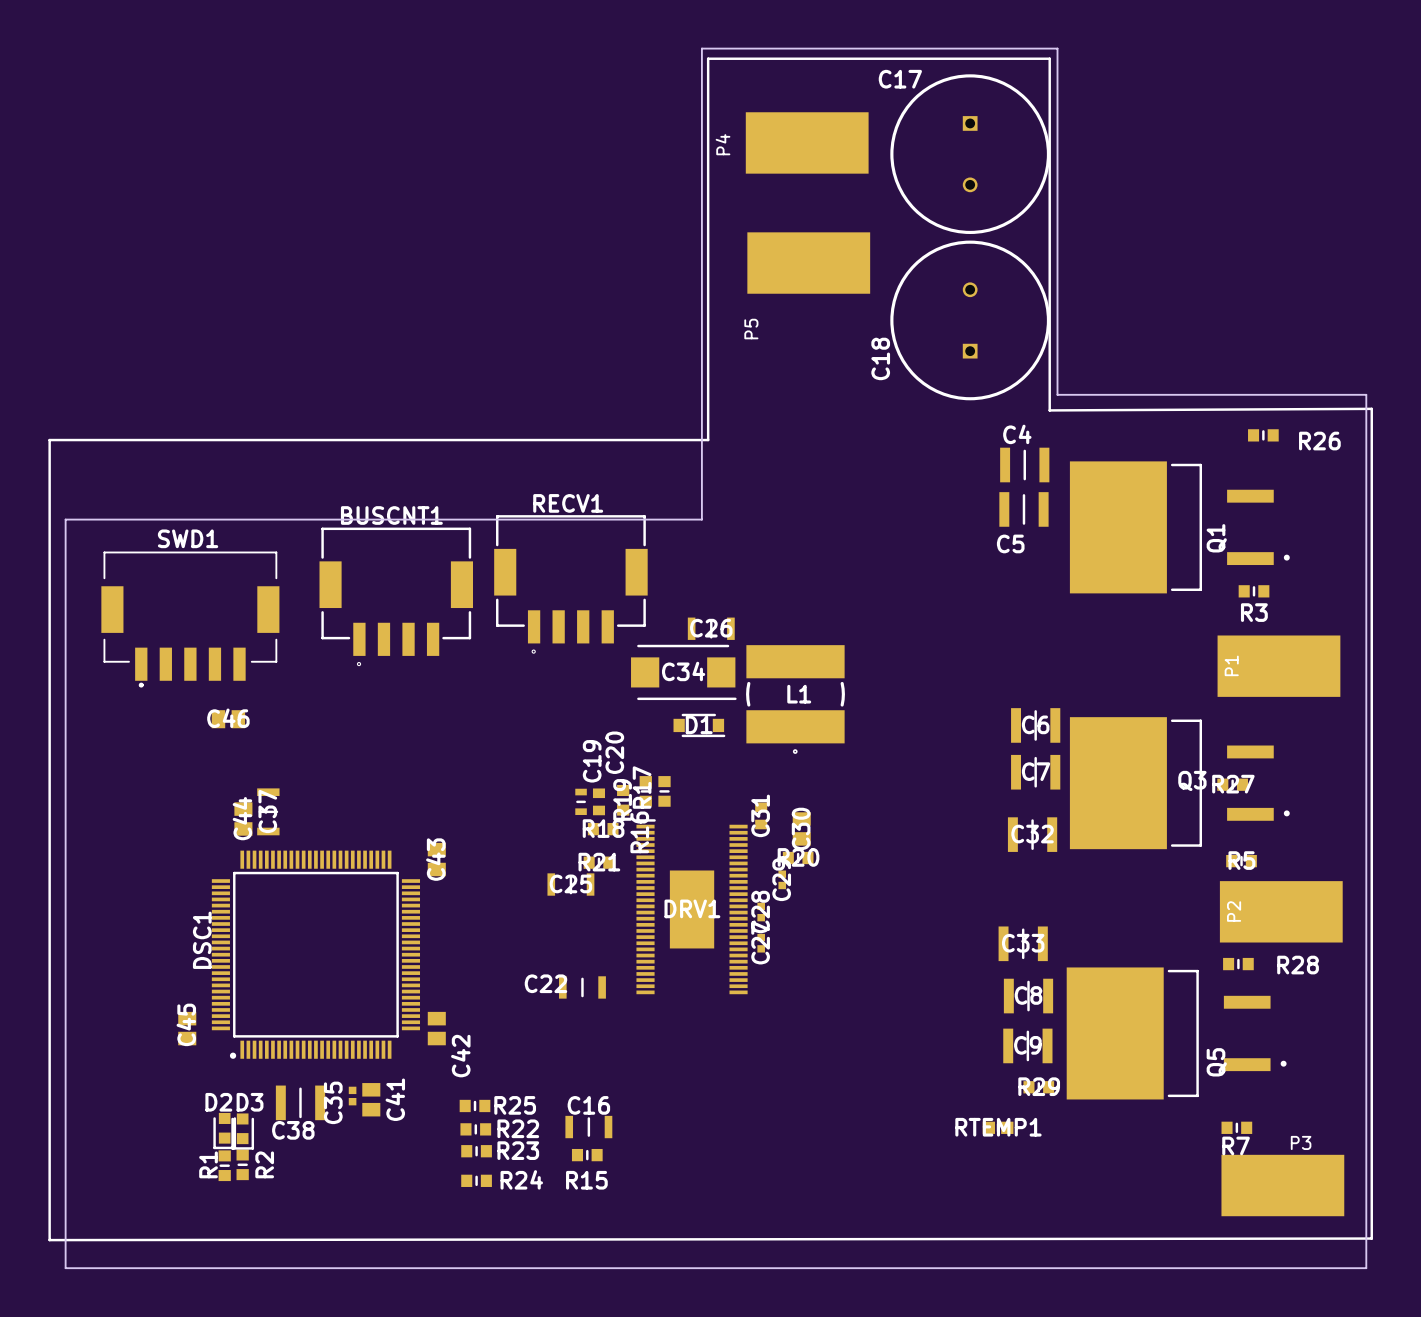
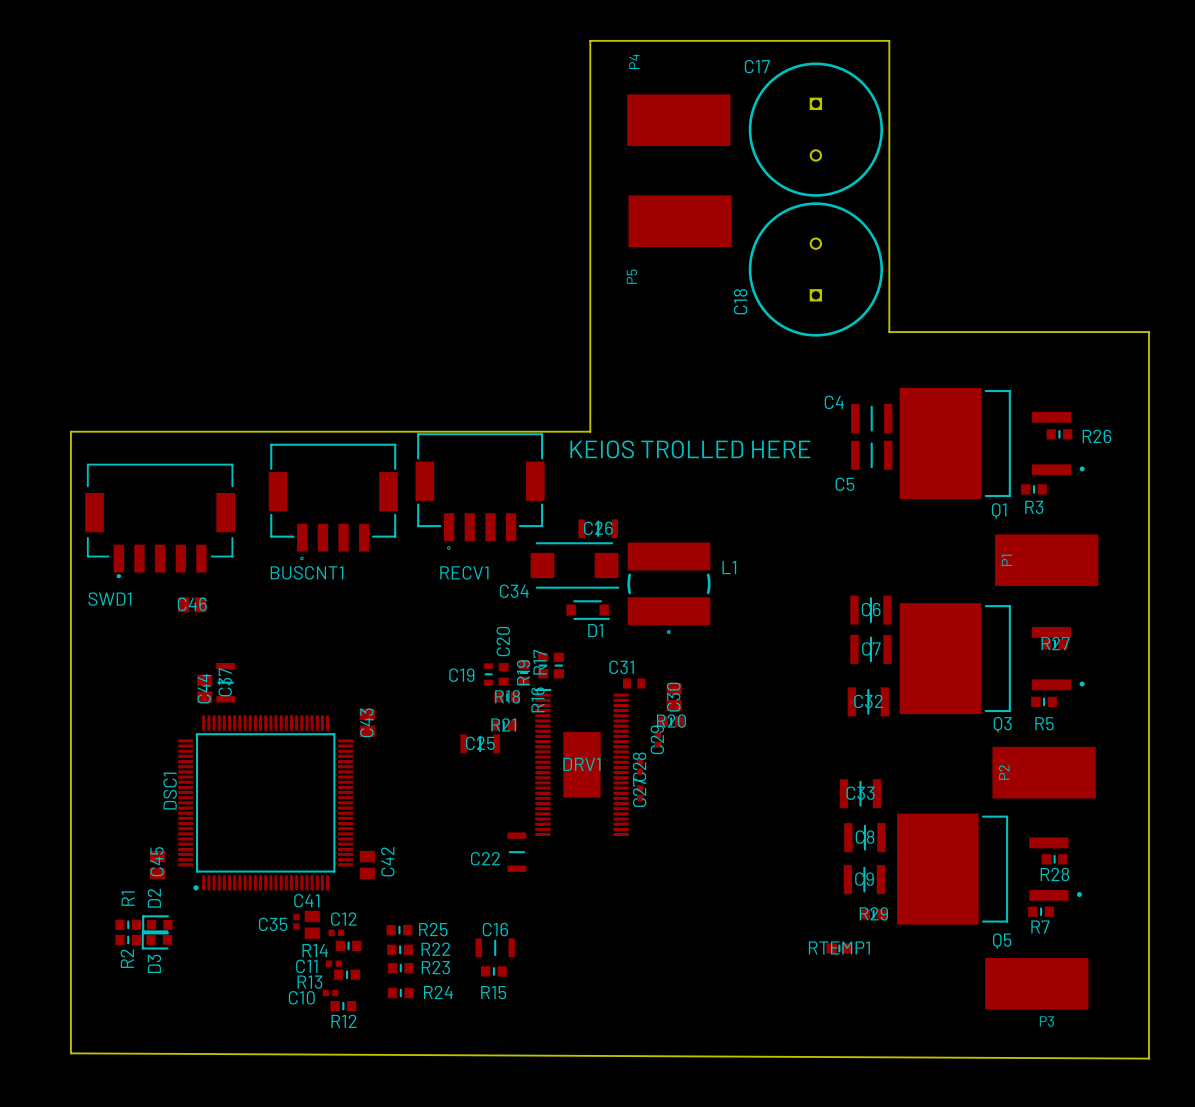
line: (708, 58) (1049, 58) (1049, 410) (1371, 408) (1371, 1238) (49, 1240) (49, 440) (708, 440) (708, 58) -> none
P4 name position: P4 (723, 144) -> P4 (634, 61)
C4 name position: C4 (1017, 434) -> C4 (834, 402)
R26 position: (1263, 435) -> (1059, 434)
R26 name position: R26 (1319, 441) -> R26 (1096, 436)
C4 position: (1024, 465) -> (871, 418)
RECV1 name position: RECV1 (568, 503) -> RECV1 (464, 572)
C5 position: (1023, 509) -> (871, 455)
board edge: (701, 513) (701, 519) (65, 519) (65, 1268) (1366, 1268) (1366, 1258) -> (590, 431) (70, 431) (70, 1053) (1149, 1058)
BUSCNT1 name position: BUSCNT1 (391, 515) -> BUSCNT1 (307, 572)
text: none -> KEIOS TROLLED HERE (690, 449)
SWD1 name position: SWD1 (188, 538) -> SWD1 (109, 599)
Q1 name rotation: 0° (1216, 538) -> 90° clockwise (999, 510)
Q1 name position: Q1 (1216, 538) -> Q1 (999, 510)
C5 name position: C5 (1010, 543) -> C5 (844, 484)
R3 position: (1254, 591) -> (1033, 489)
P1 position: (1278, 666) -> (1046, 560)
C34 name position: C34 (683, 671) -> C34 (514, 591)
L1 name position: L1 (799, 694) -> L1 (729, 567)
D1 name position: D1 (699, 724) -> D1 (595, 630)
C20 name position: C20 (614, 752) -> C20 (503, 641)
C19 name rotation: 0° (592, 761) -> 90° clockwise (461, 675)
C19 name position: C19 (592, 761) -> C19 (461, 675)
Q3 name position: Q3 (1192, 780) -> Q3 (1002, 724)
R27 position: (1232, 784) -> (1054, 644)
C31 rotation: 0° (761, 815) -> 90° clockwise (634, 683)
R5 position: (1241, 861) -> (1044, 701)
P2 position: (1281, 911) -> (1044, 772)
R28 position: (1238, 964) -> (1054, 859)
R28 name position: R28 (1298, 965) -> R28 (1054, 874)
C22 rotation: 0° (582, 987) -> 90° clockwise (516, 852)
C22 position: (582, 987) -> (516, 852)
C42 name position: C42 (460, 1056) -> C42 (387, 861)
Q5 name rotation: 0° (1216, 1062) -> 90° clockwise (1002, 941)
Q5 name position: Q5 (1216, 1062) -> Q5 (1002, 941)
C41 name rotation: 0° (395, 1099) -> 90° clockwise (306, 900)
D3 name position: D3 (250, 1102) -> D3 (154, 963)
C38: (300, 1102) -> none
C35 name rotation: 0° (333, 1102) -> 90° clockwise (273, 924)
C12: none -> (336, 932)
R14: none -> (348, 945)
R7 position: (1236, 1127) -> (1041, 911)
D2 rotation: 0° (224, 1131) -> 90° clockwise (157, 924)
D2 position: (224, 1131) -> (157, 924)
D3 rotation: 0° (242, 1131) -> 90° clockwise (156, 939)
D3 position: (242, 1131) -> (156, 939)
P3 name position: P3 (1301, 1142) -> P3 (1046, 1021)
C11: none -> (333, 963)
R13: none -> (347, 974)
R2 rotation: 0° (242, 1164) -> 90° clockwise (128, 939)
R2 position: (242, 1164) -> (128, 939)
R1 rotation: 0° (224, 1165) -> 90° clockwise (128, 924)
R1 position: (224, 1165) -> (128, 924)
C10: none -> (330, 993)
P3 position: (1282, 1185) -> (1036, 983)
R12: none -> (343, 1006)

